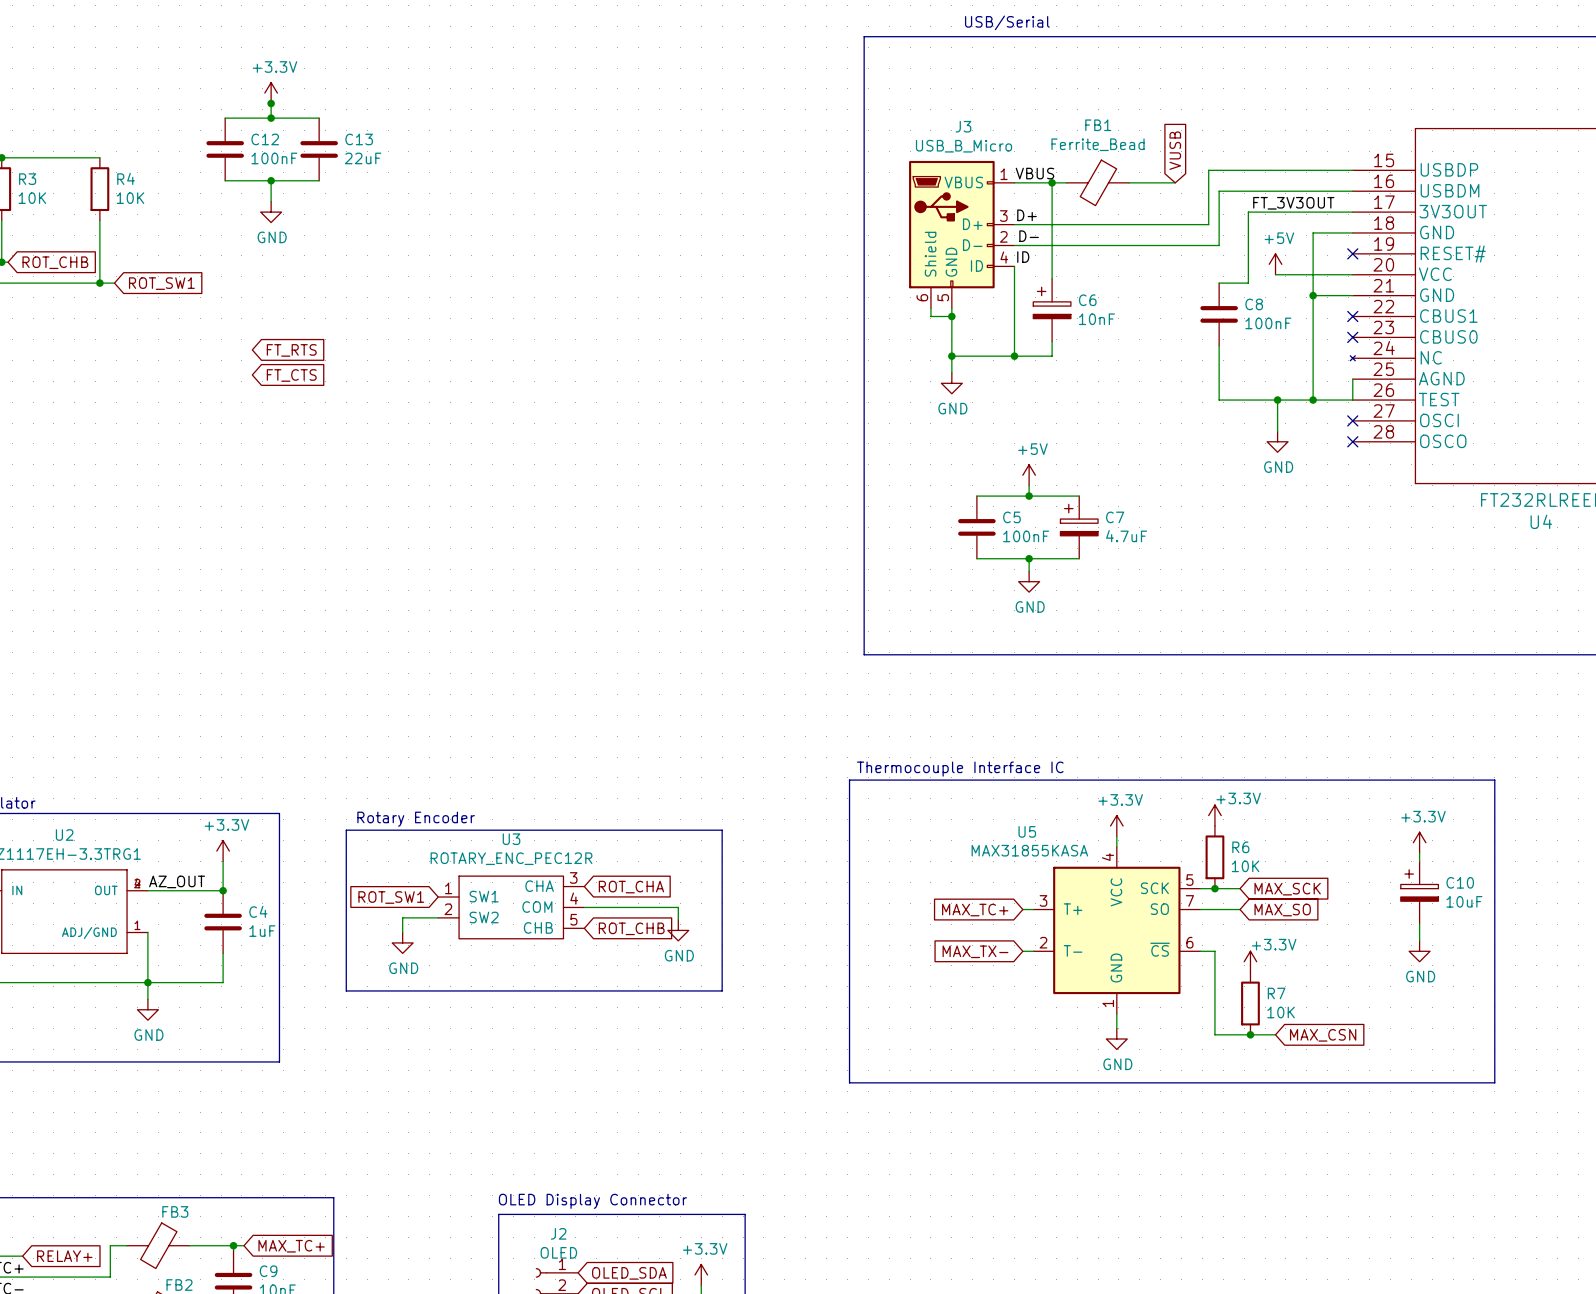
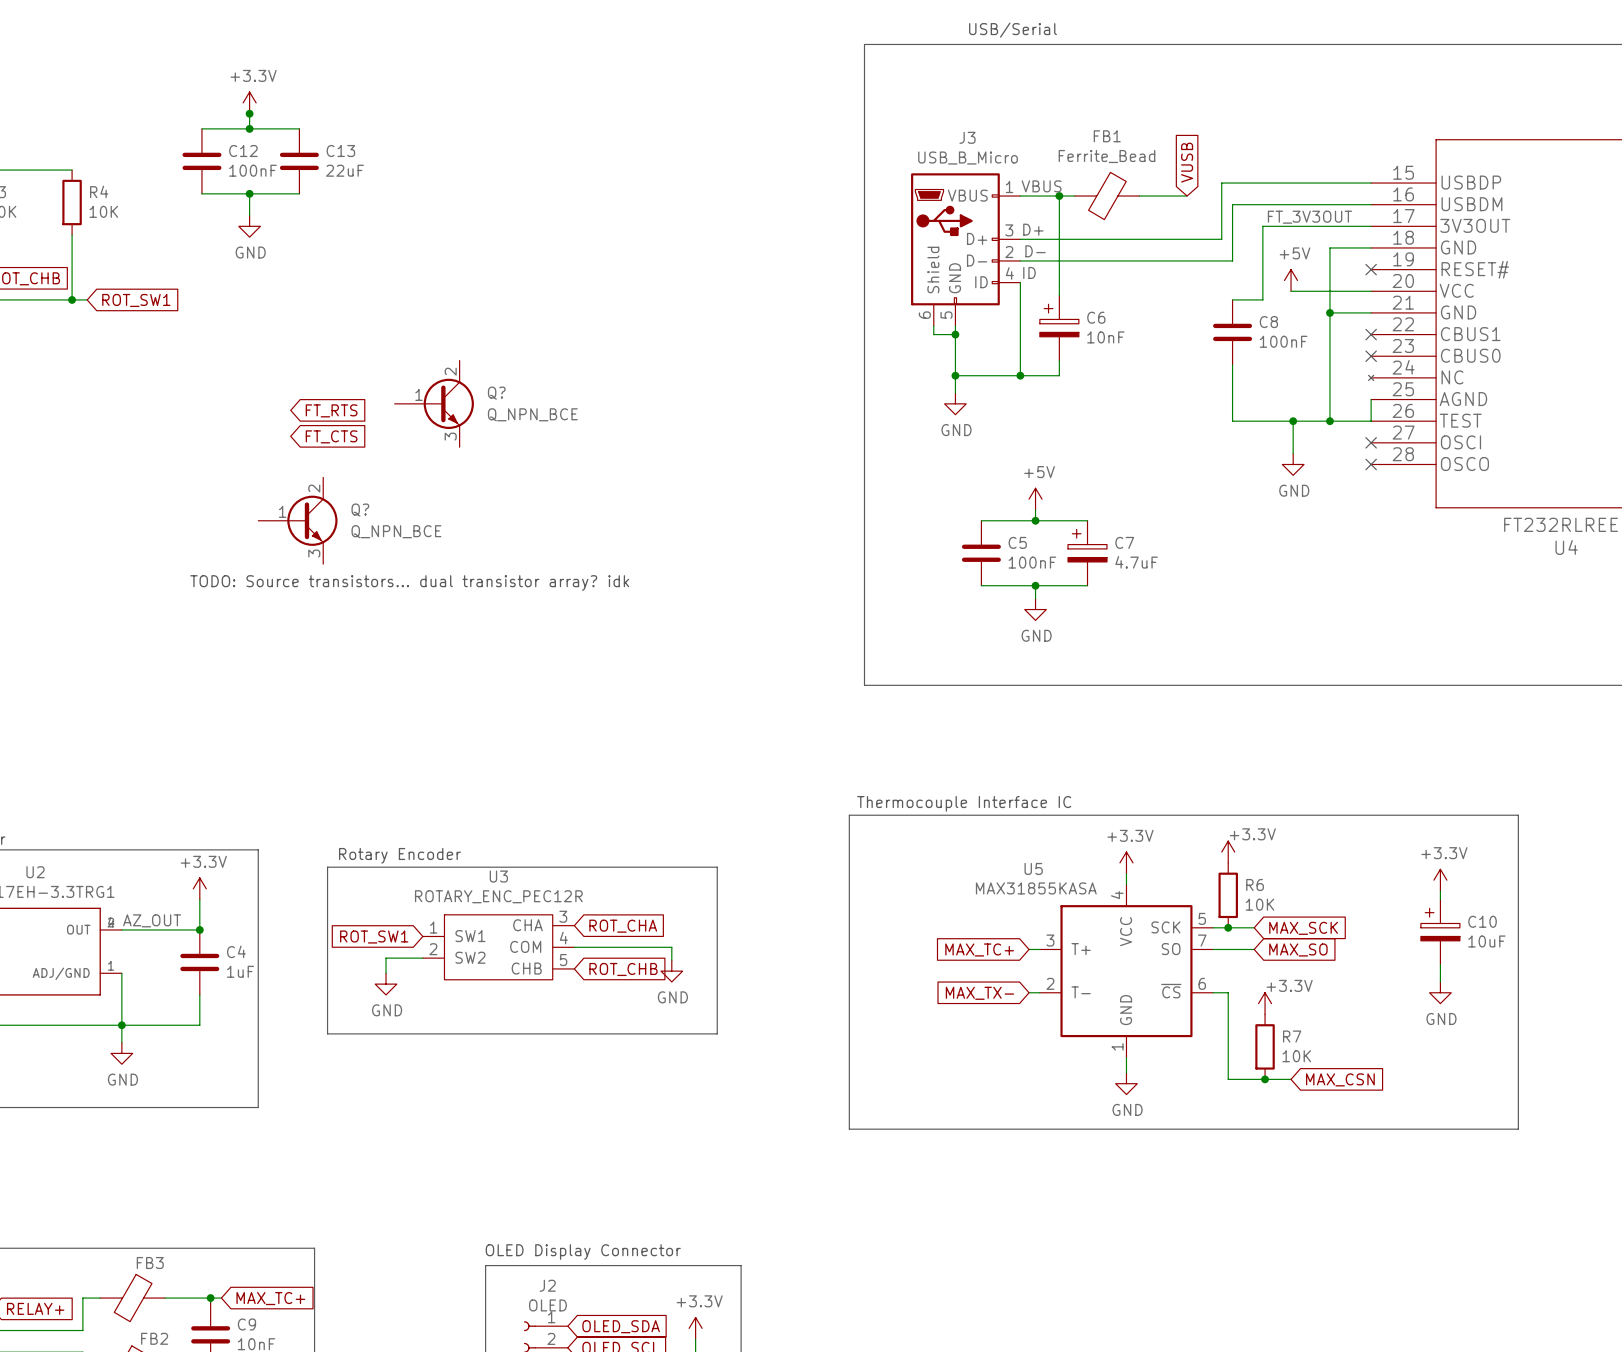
global label position: FT_RTS (291, 350) -> FT_RTS (331, 410)
global label position: FT_CTS (291, 375) -> FT_CTS (331, 436)
Q?: none -> Q_NPN_BCE (434, 403)
Q?: none -> Q_NPN_BCE (297, 520)
text: none -> TODO: Source transistors... dual transistor array? idk (409, 583)

